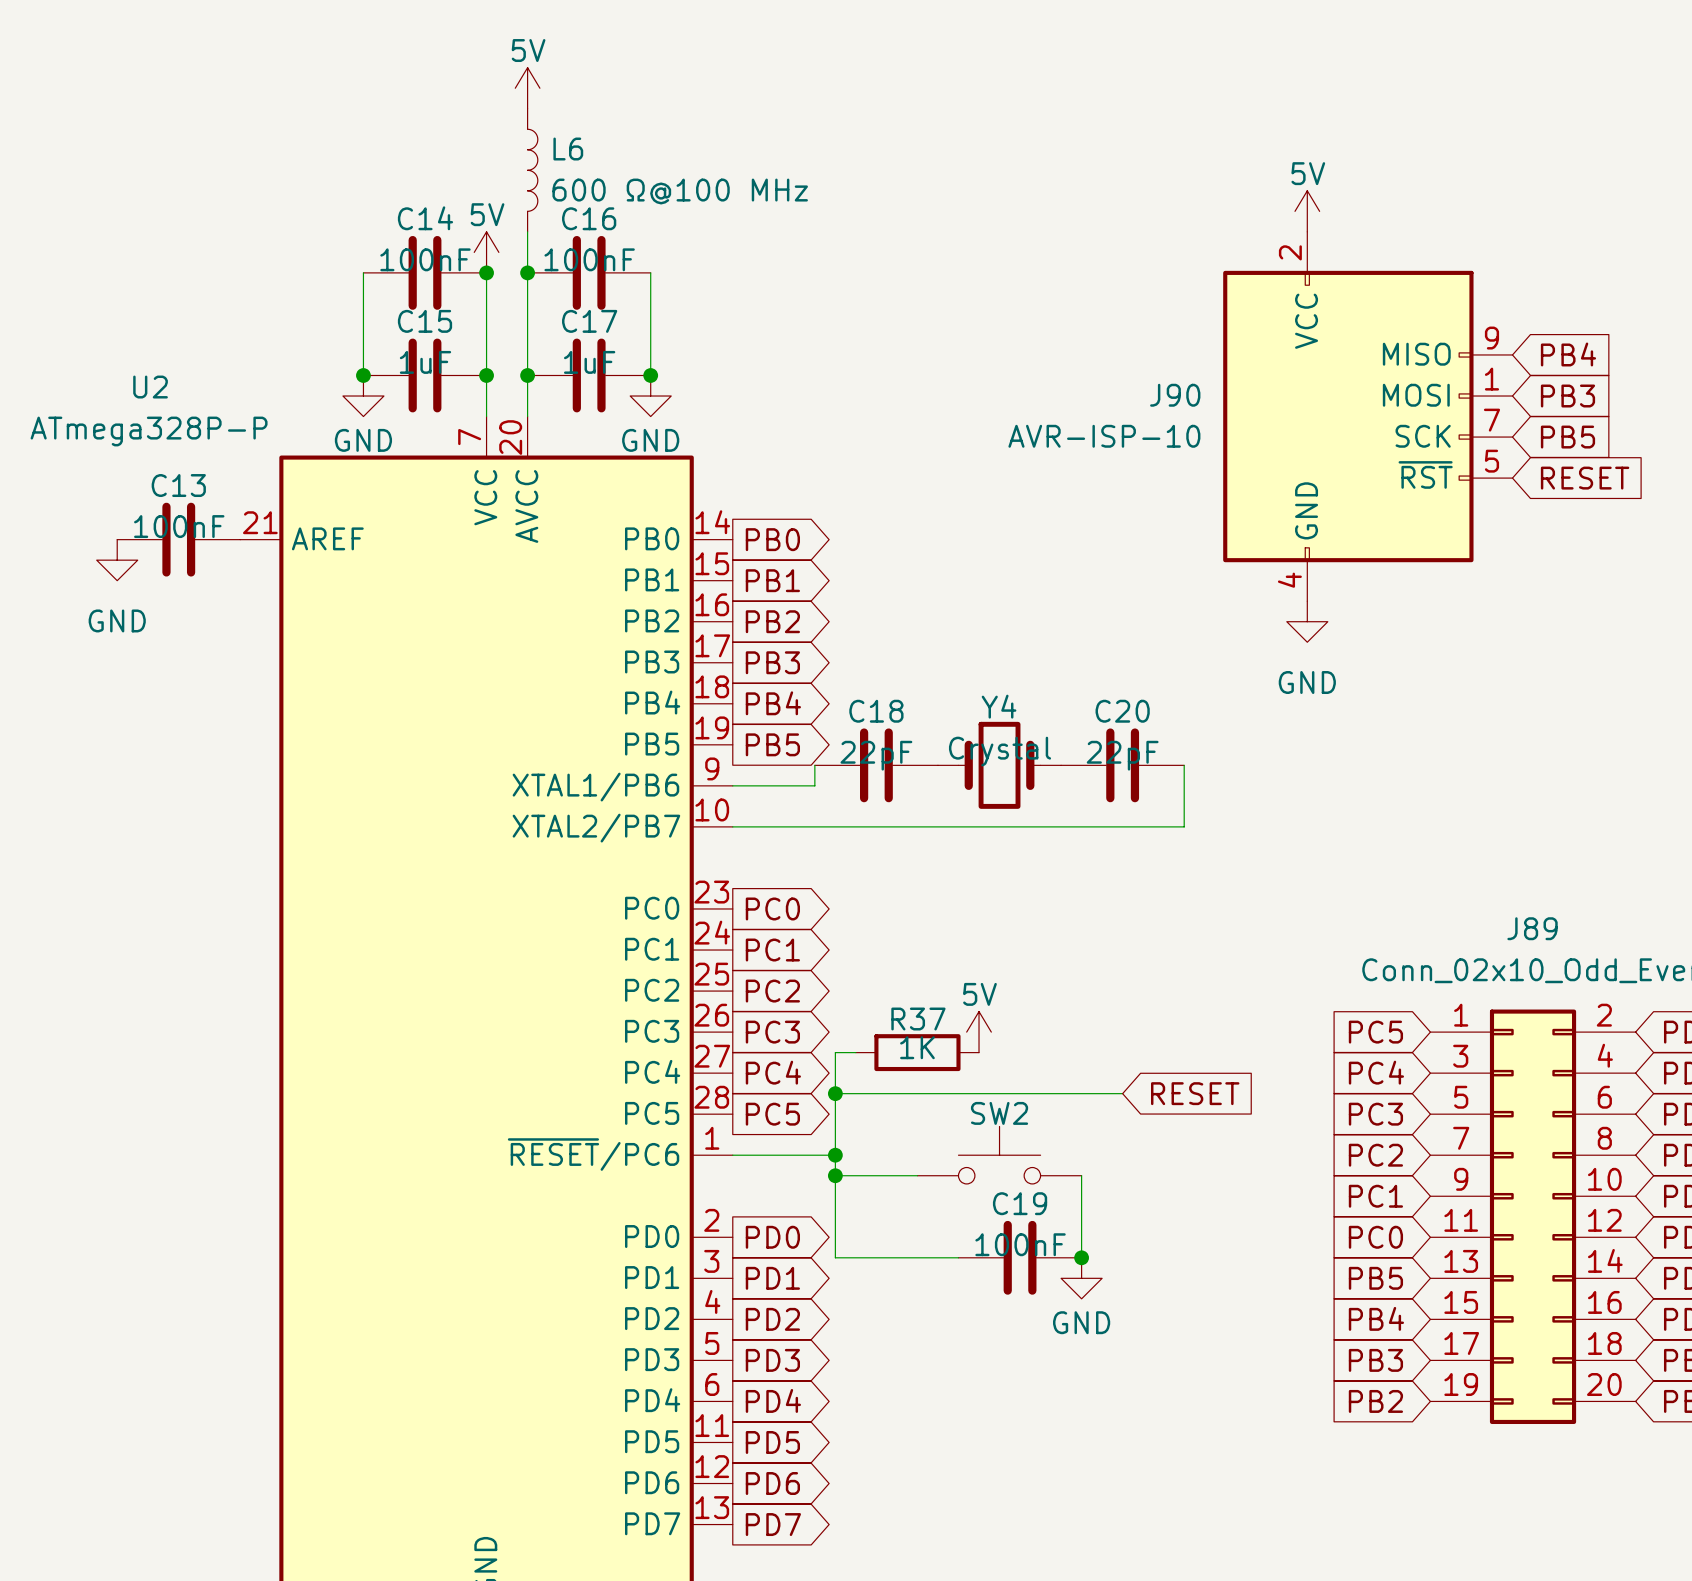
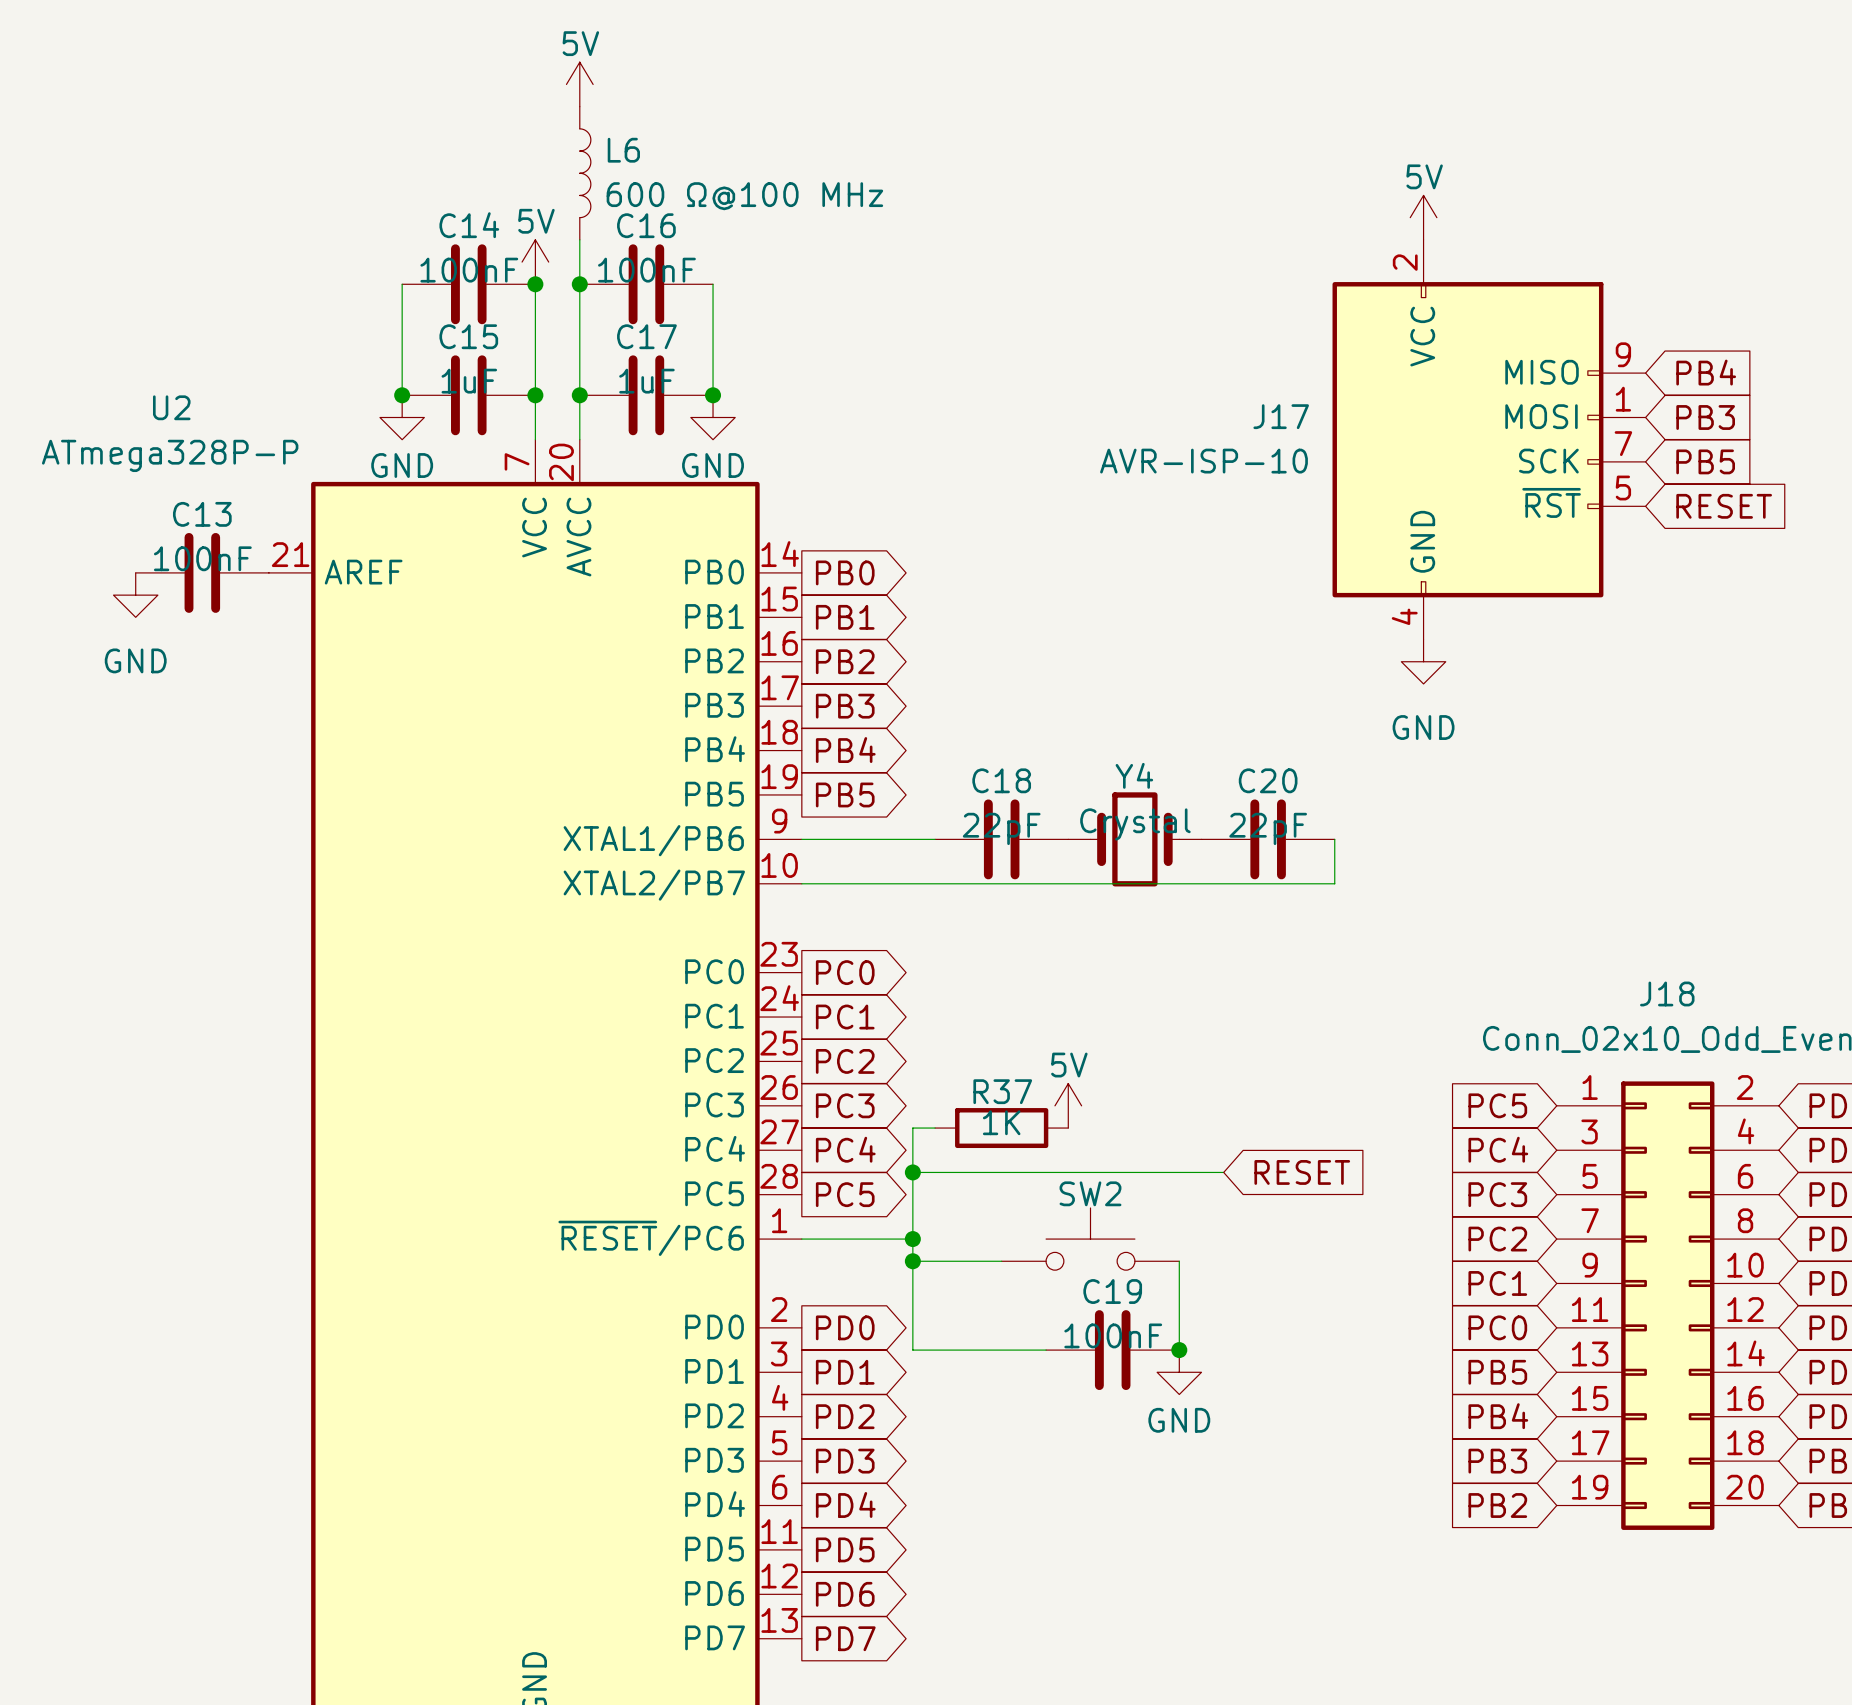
J90 name: J90 (1175, 395) -> J17 (1281, 416)
wire: (814, 765) (814, 785) -> (935, 839) (890, 839)
C18 position: (876, 765) -> (1001, 839)
Y4 position: (999, 765) -> (1134, 839)
C20 position: (1122, 765) -> (1268, 839)
wire: (1184, 765) (1184, 826) -> (1334, 839) (1334, 883) (1290, 883)
J89 name: J89 (1532, 928) -> J18 (1667, 993)

